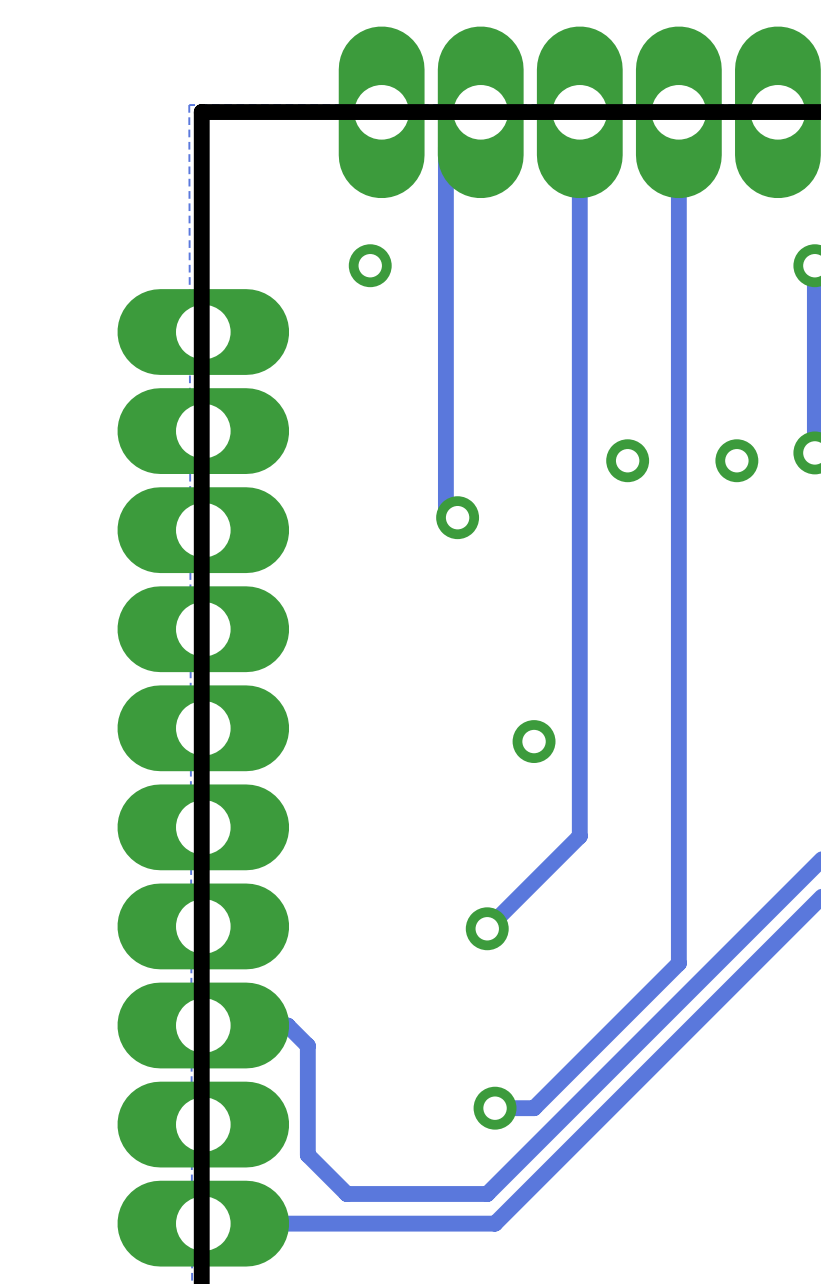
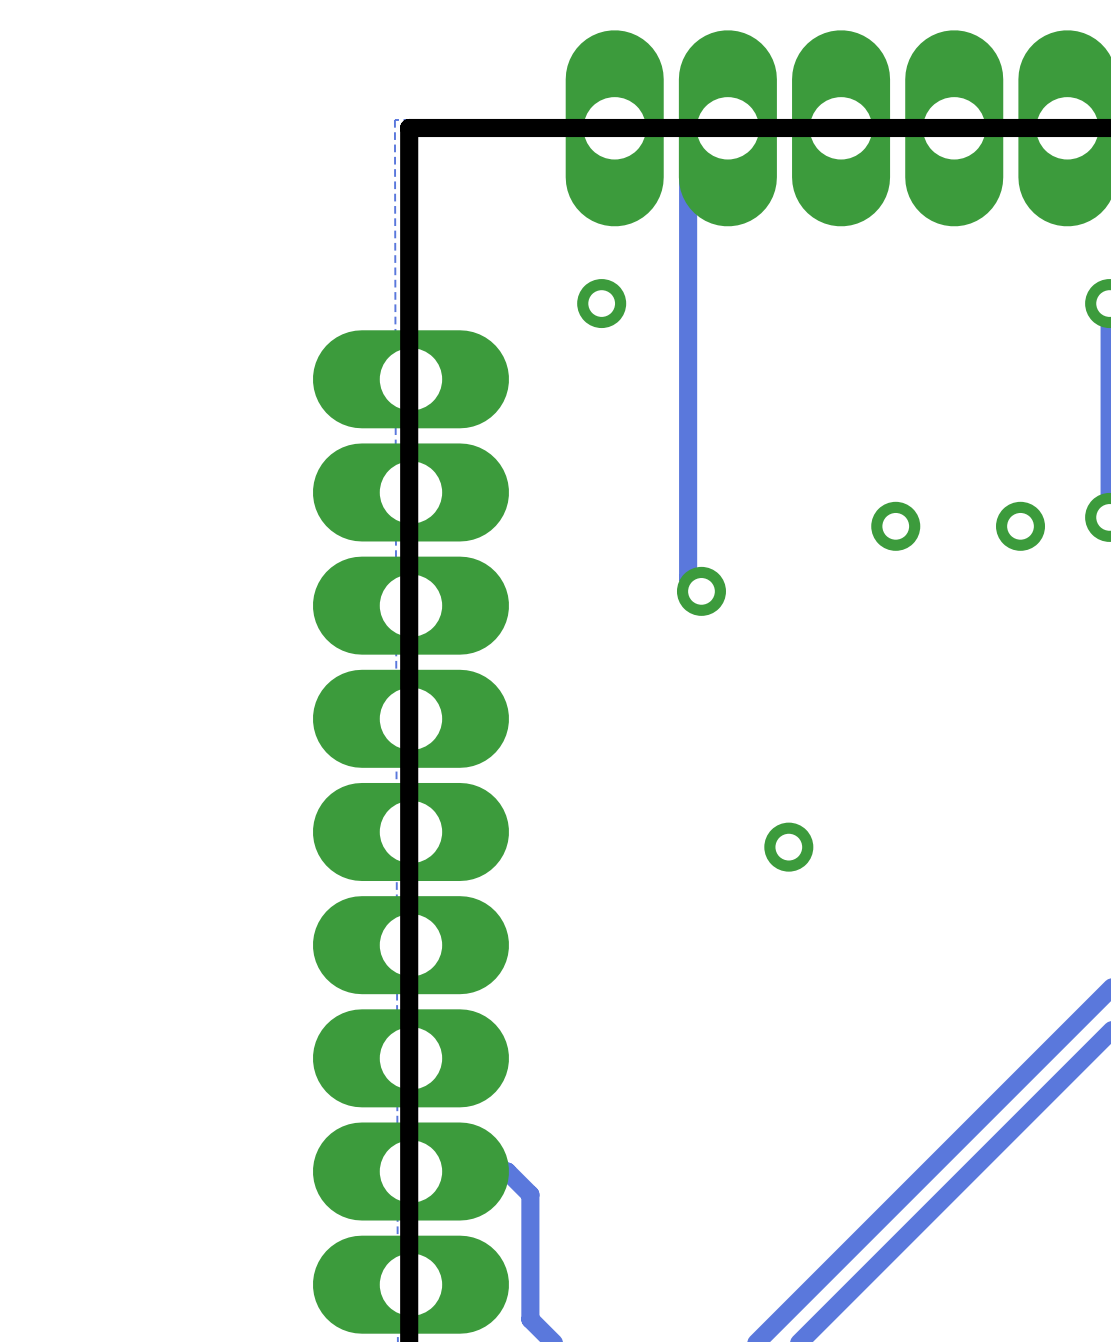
track: (579, 112) (579, 836) (487, 928) -> none
track: (678, 112) (678, 963) (534, 1108) (495, 1108) -> none
via: (487, 928) -> none
via: (495, 1108) -> none

